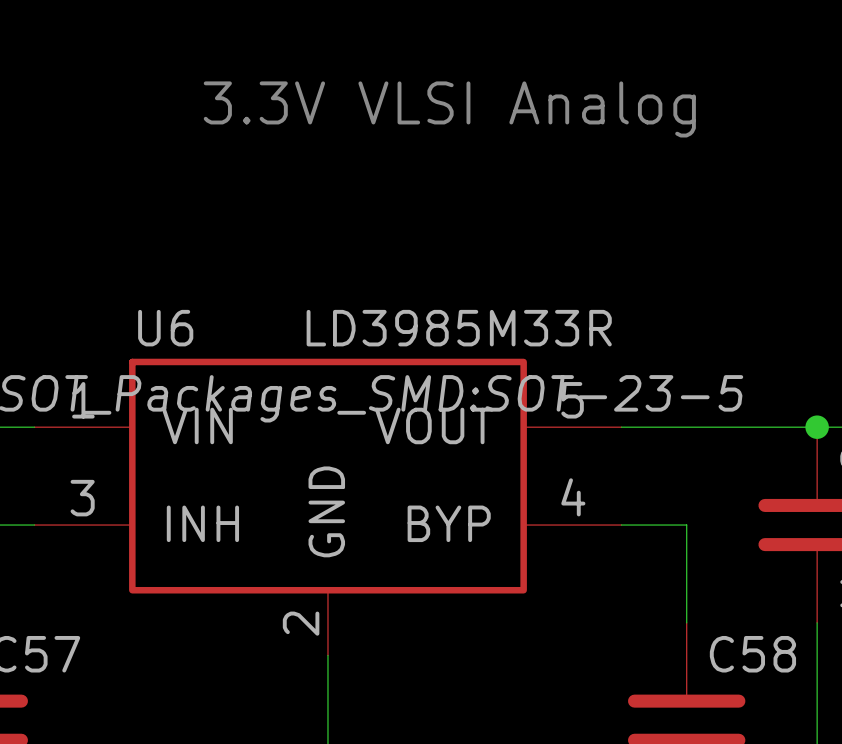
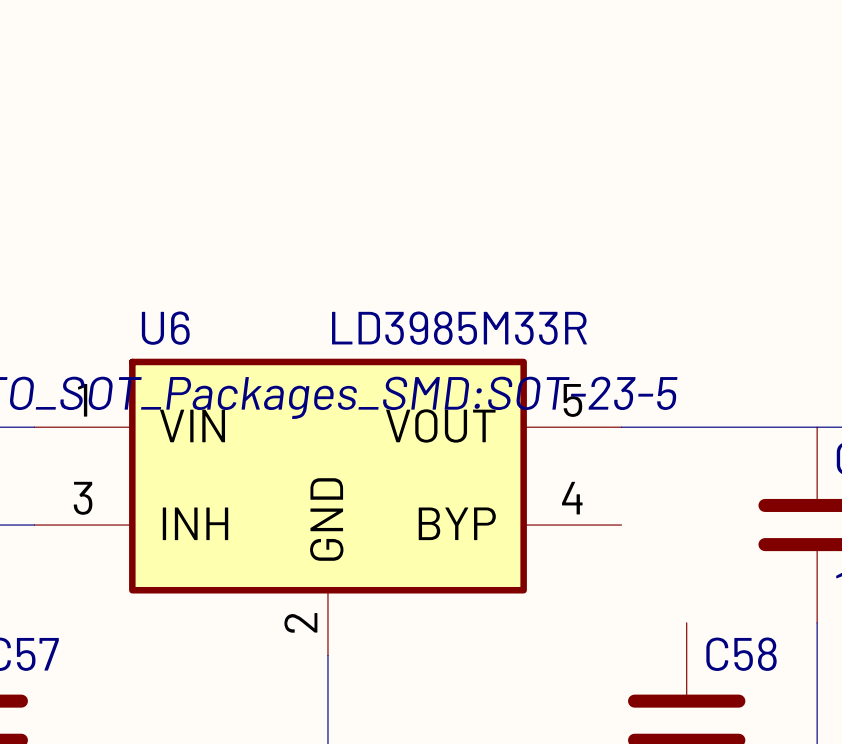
text: 3.3V VLSI Analog (449, 109) -> none
junction: (817, 427) -> none
wire: (621, 525) (686, 525) (686, 622) -> none

